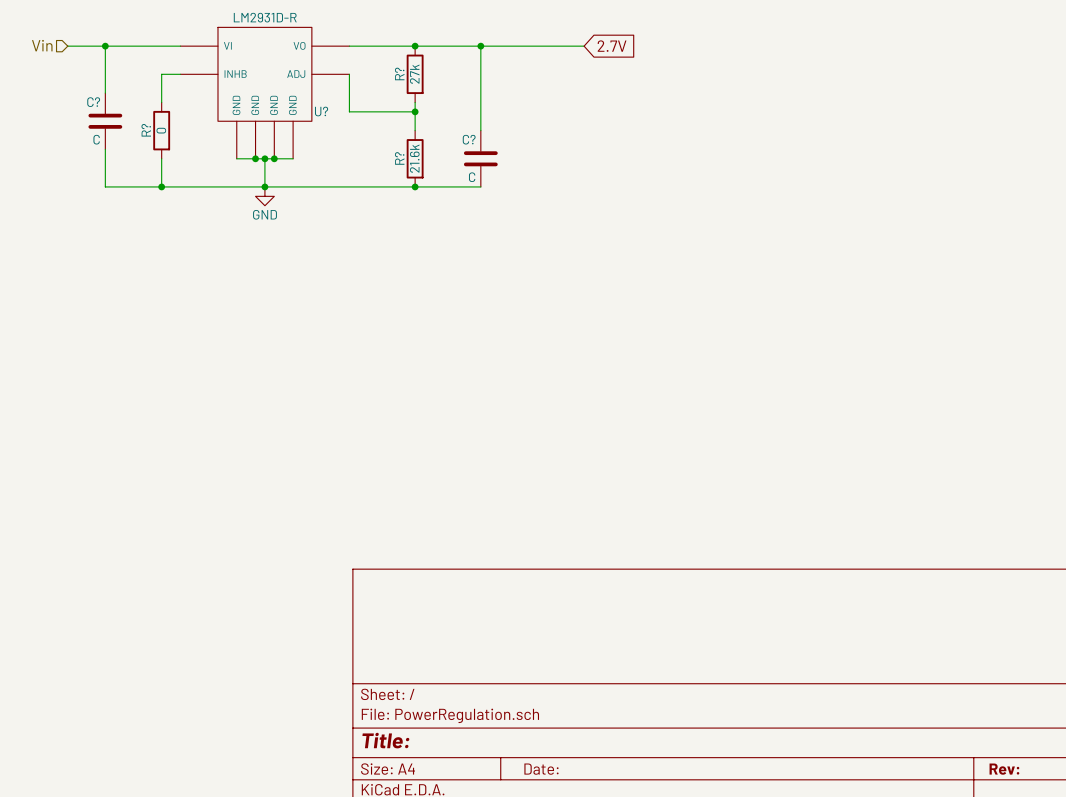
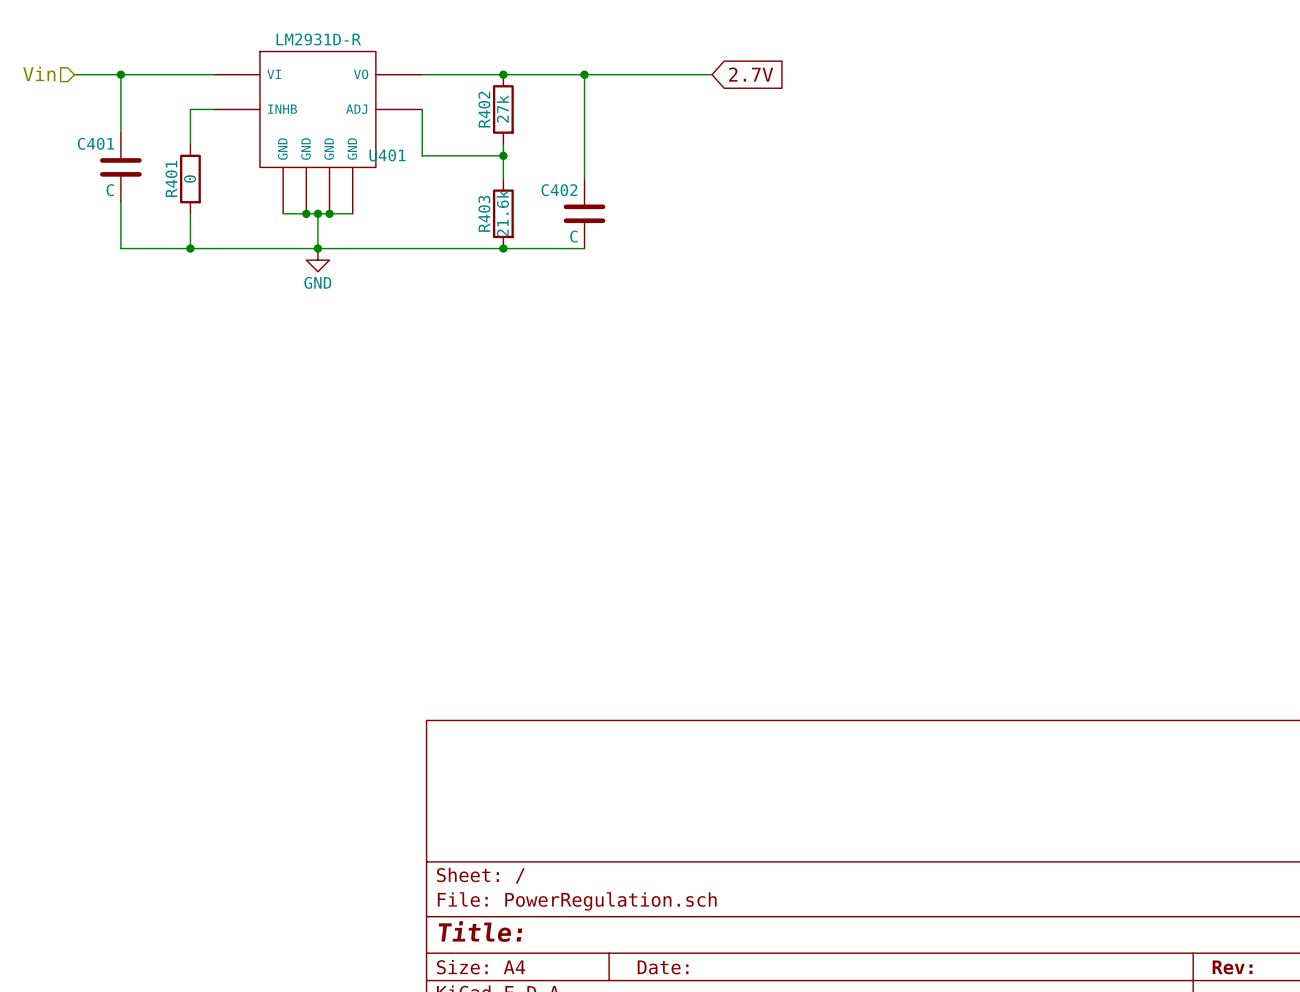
R? name: R? (399, 73) -> R402 (484, 109)
C? name: C? (93, 102) -> C401 (95, 143)
U? name: U? (321, 111) -> U401 (387, 155)
R? name: R? (146, 130) -> R401 (171, 179)
C? name: C? (469, 139) -> C402 (559, 190)
R? name: R? (399, 158) -> R403 (484, 213)

